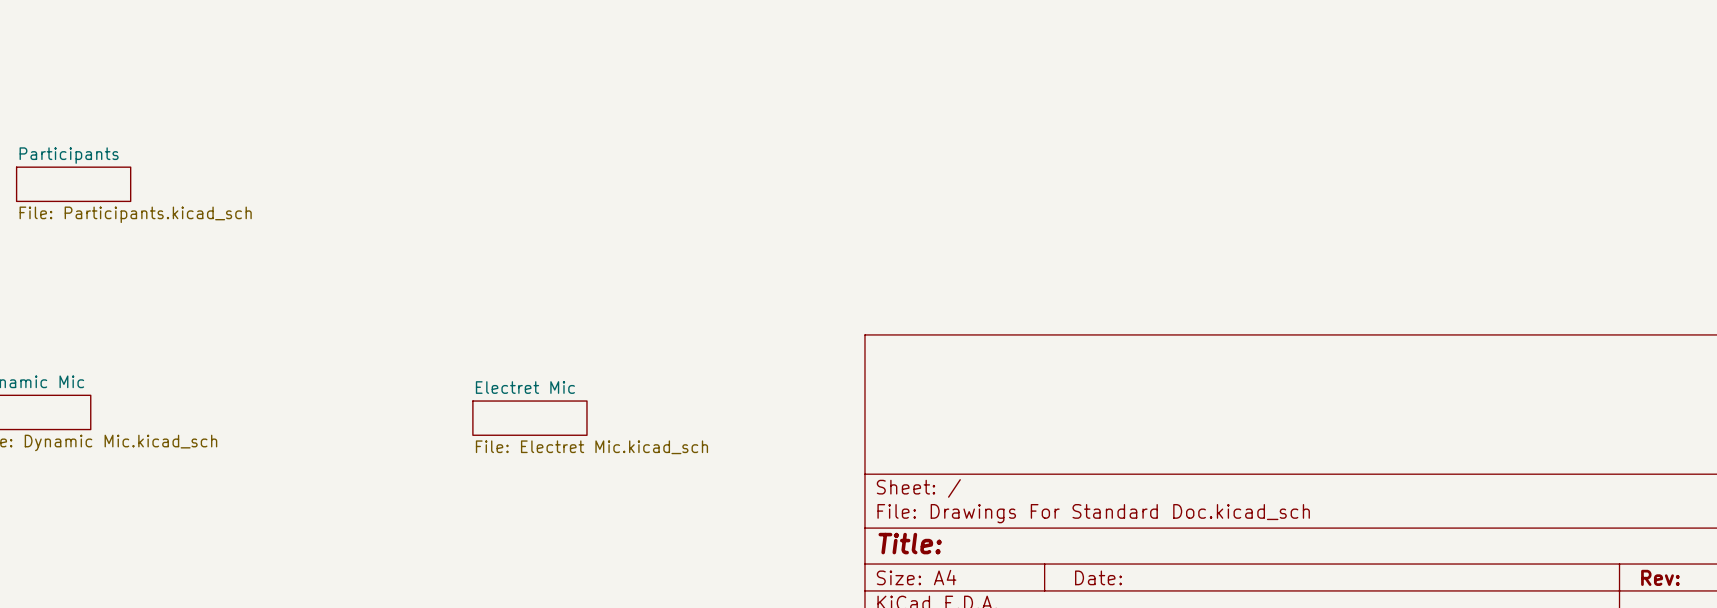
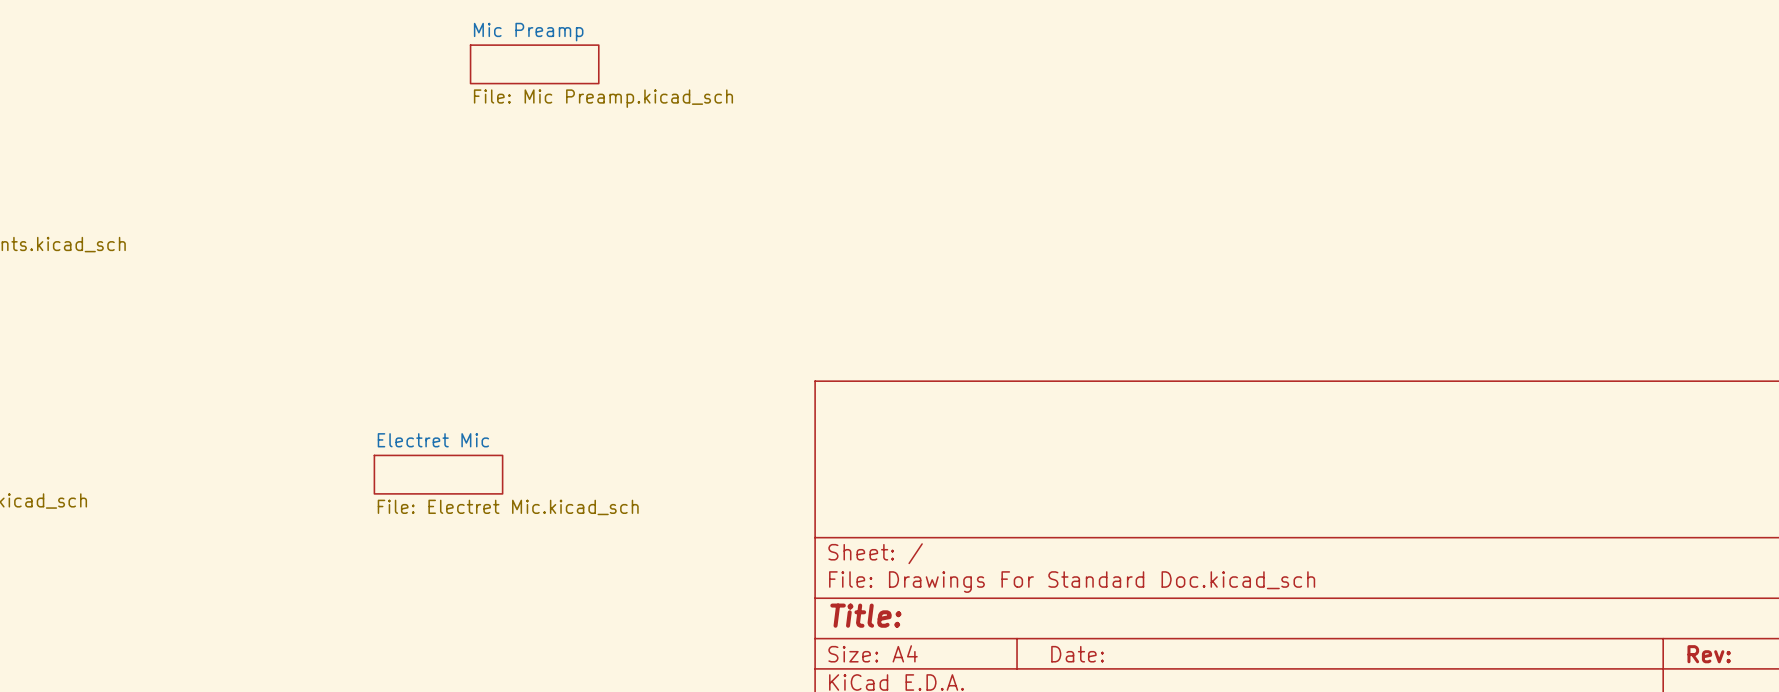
sheet Mic Preamp: none -> File: Mic Preamp.kicad_sch (534, 64)

